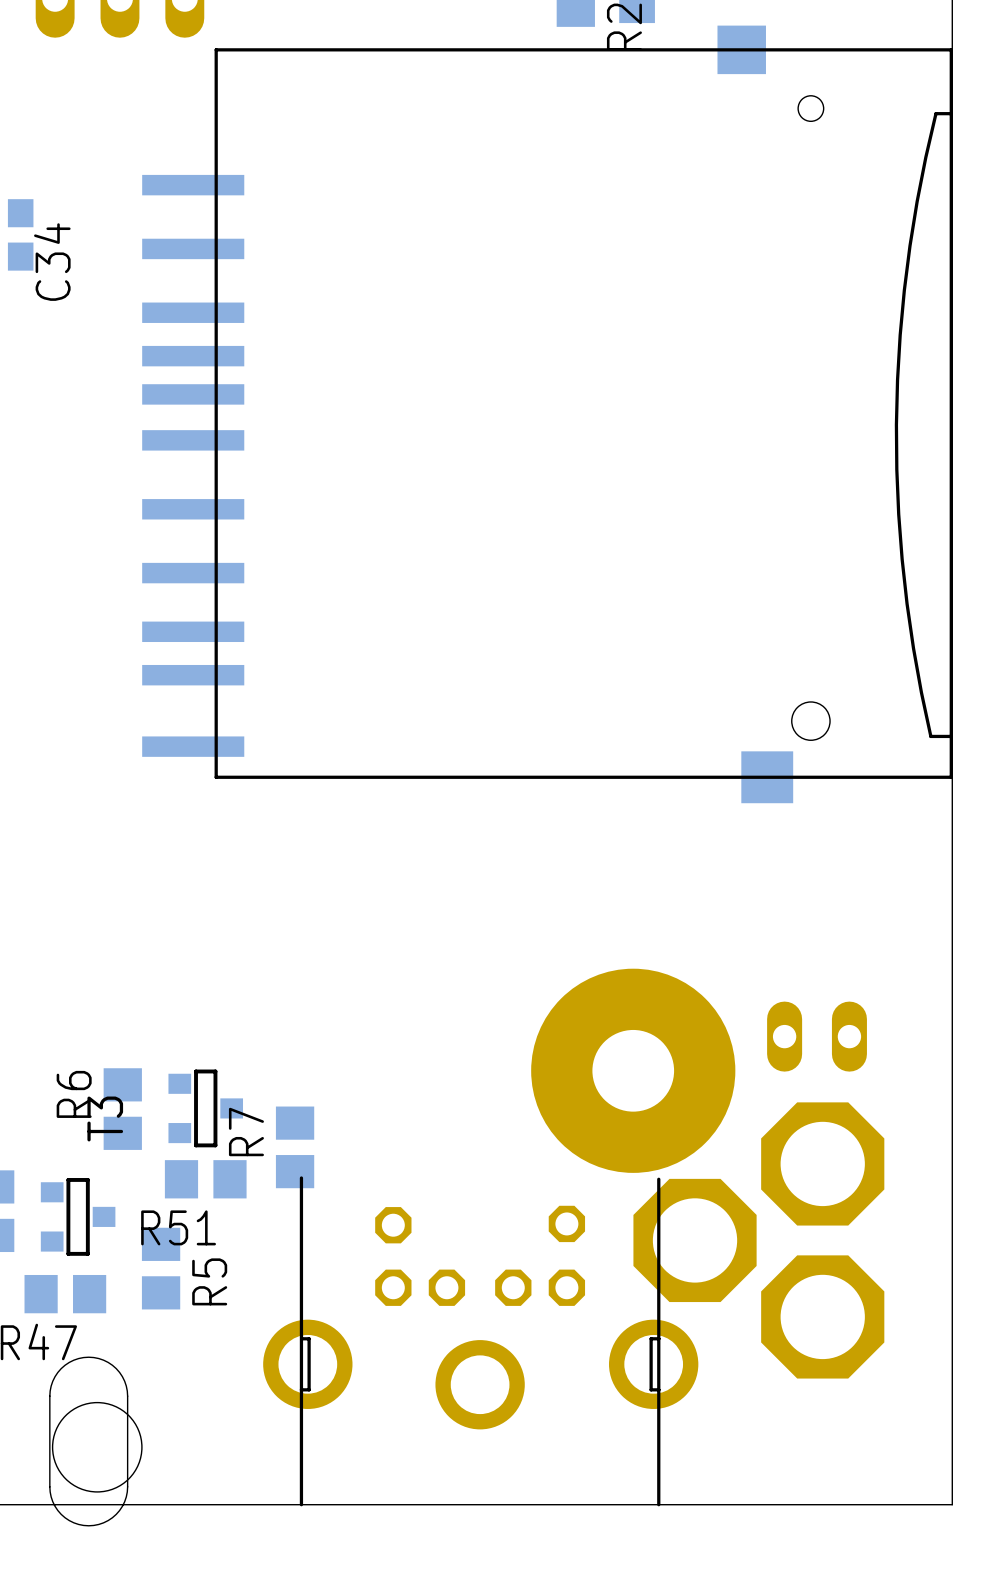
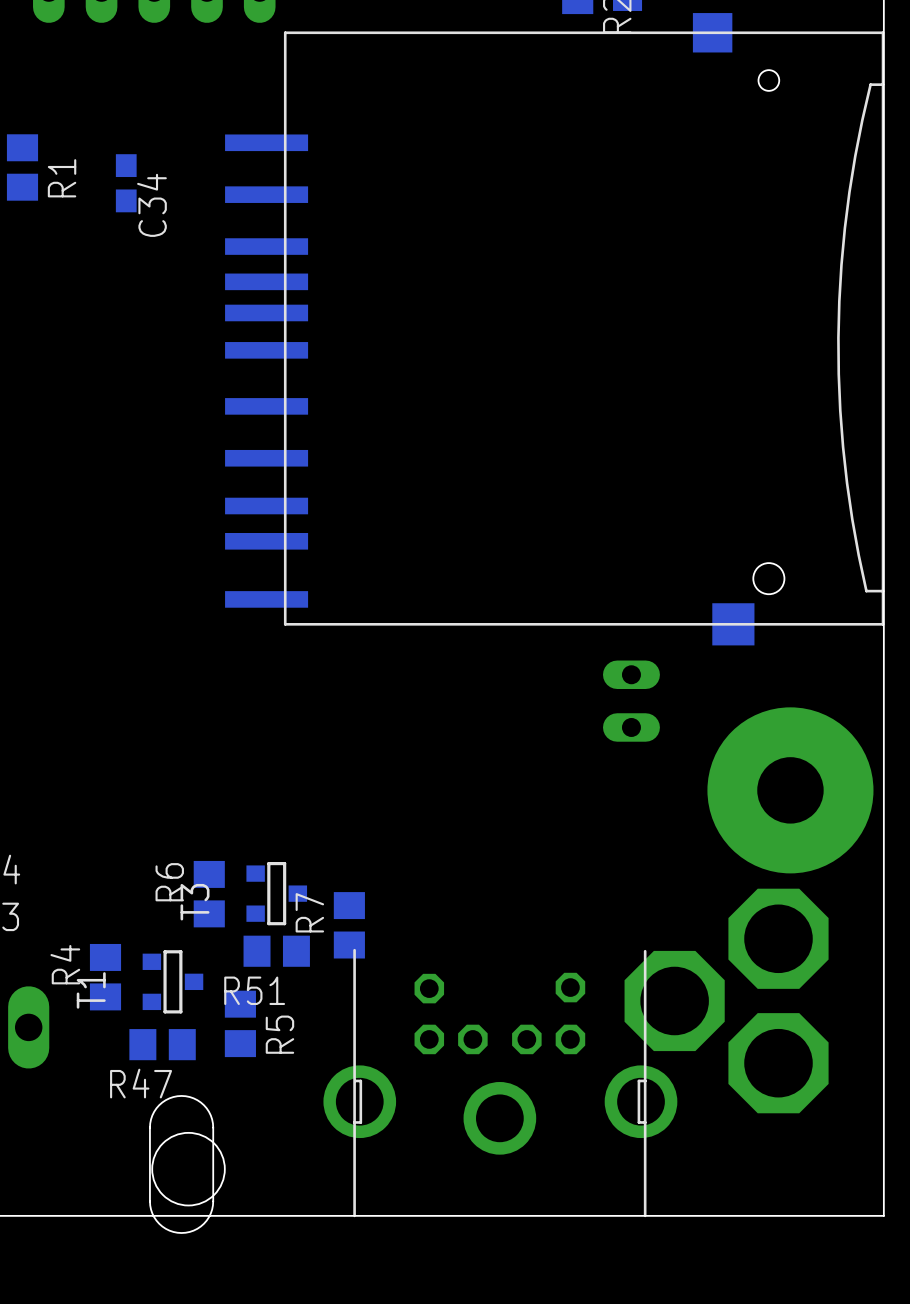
part rotation: 0° (817, 1036) -> 90° clockwise (631, 701)
part position: (817, 1036) -> (631, 701)
part position: (633, 1070) -> (790, 790)

